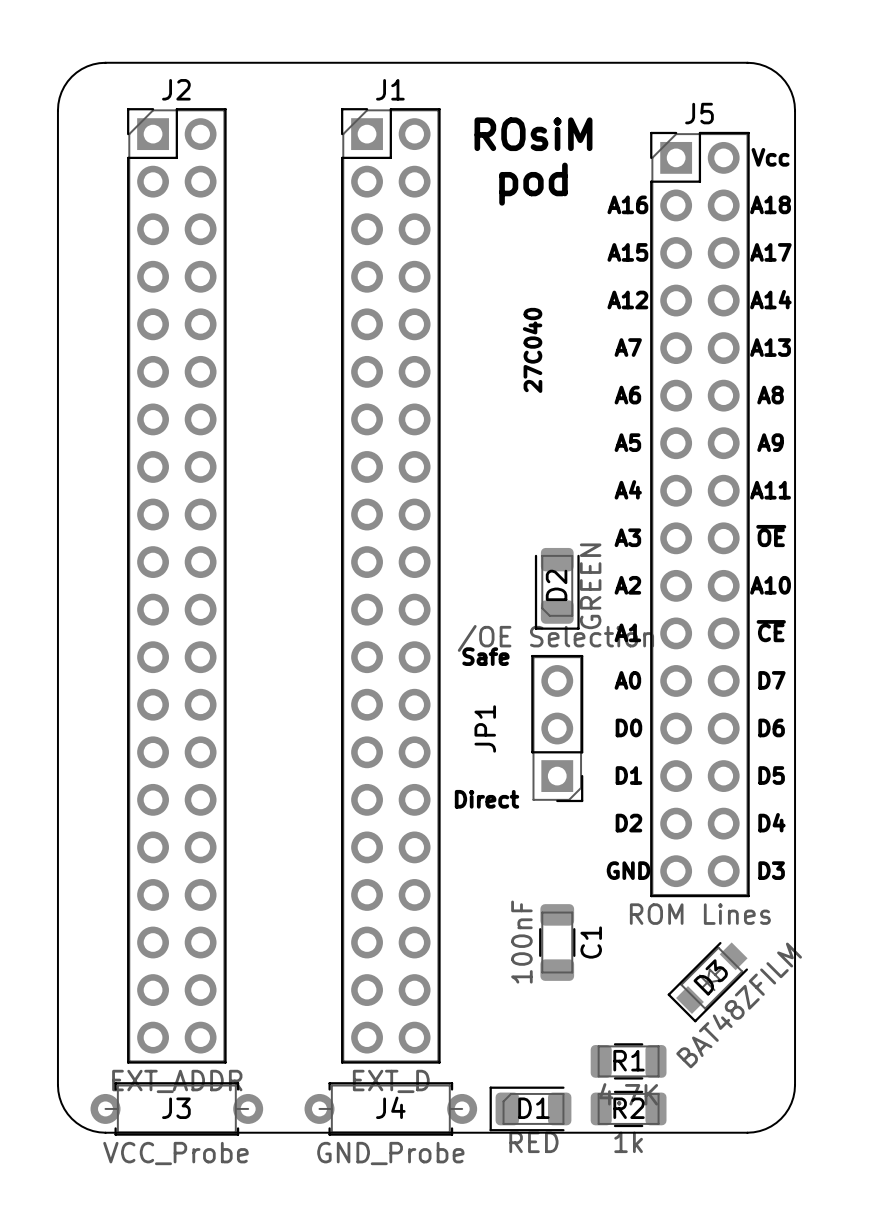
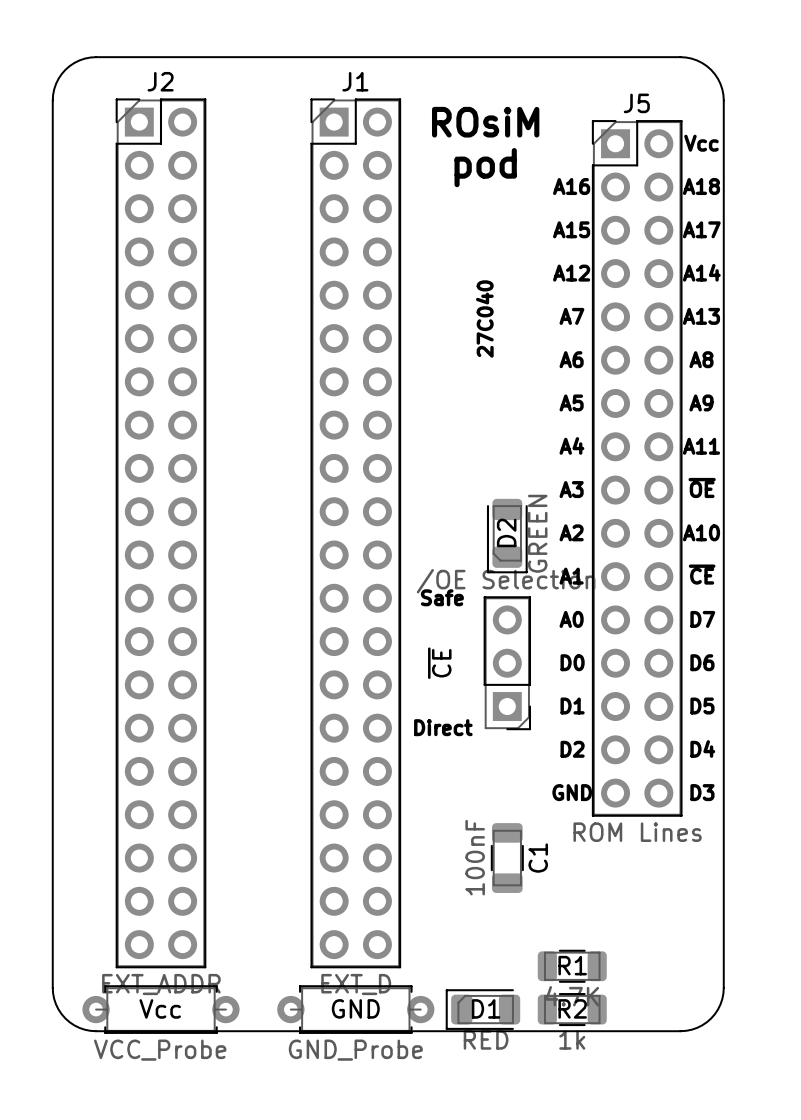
JP1 name: JP1 (485, 728) -> ~{CE} (439, 663)
D3: BAT48ZFILM (707, 982) -> none
J4 name: J4 (390, 1107) -> GND (355, 1008)
J3 name: J3 (176, 1108) -> Vcc (160, 1008)

